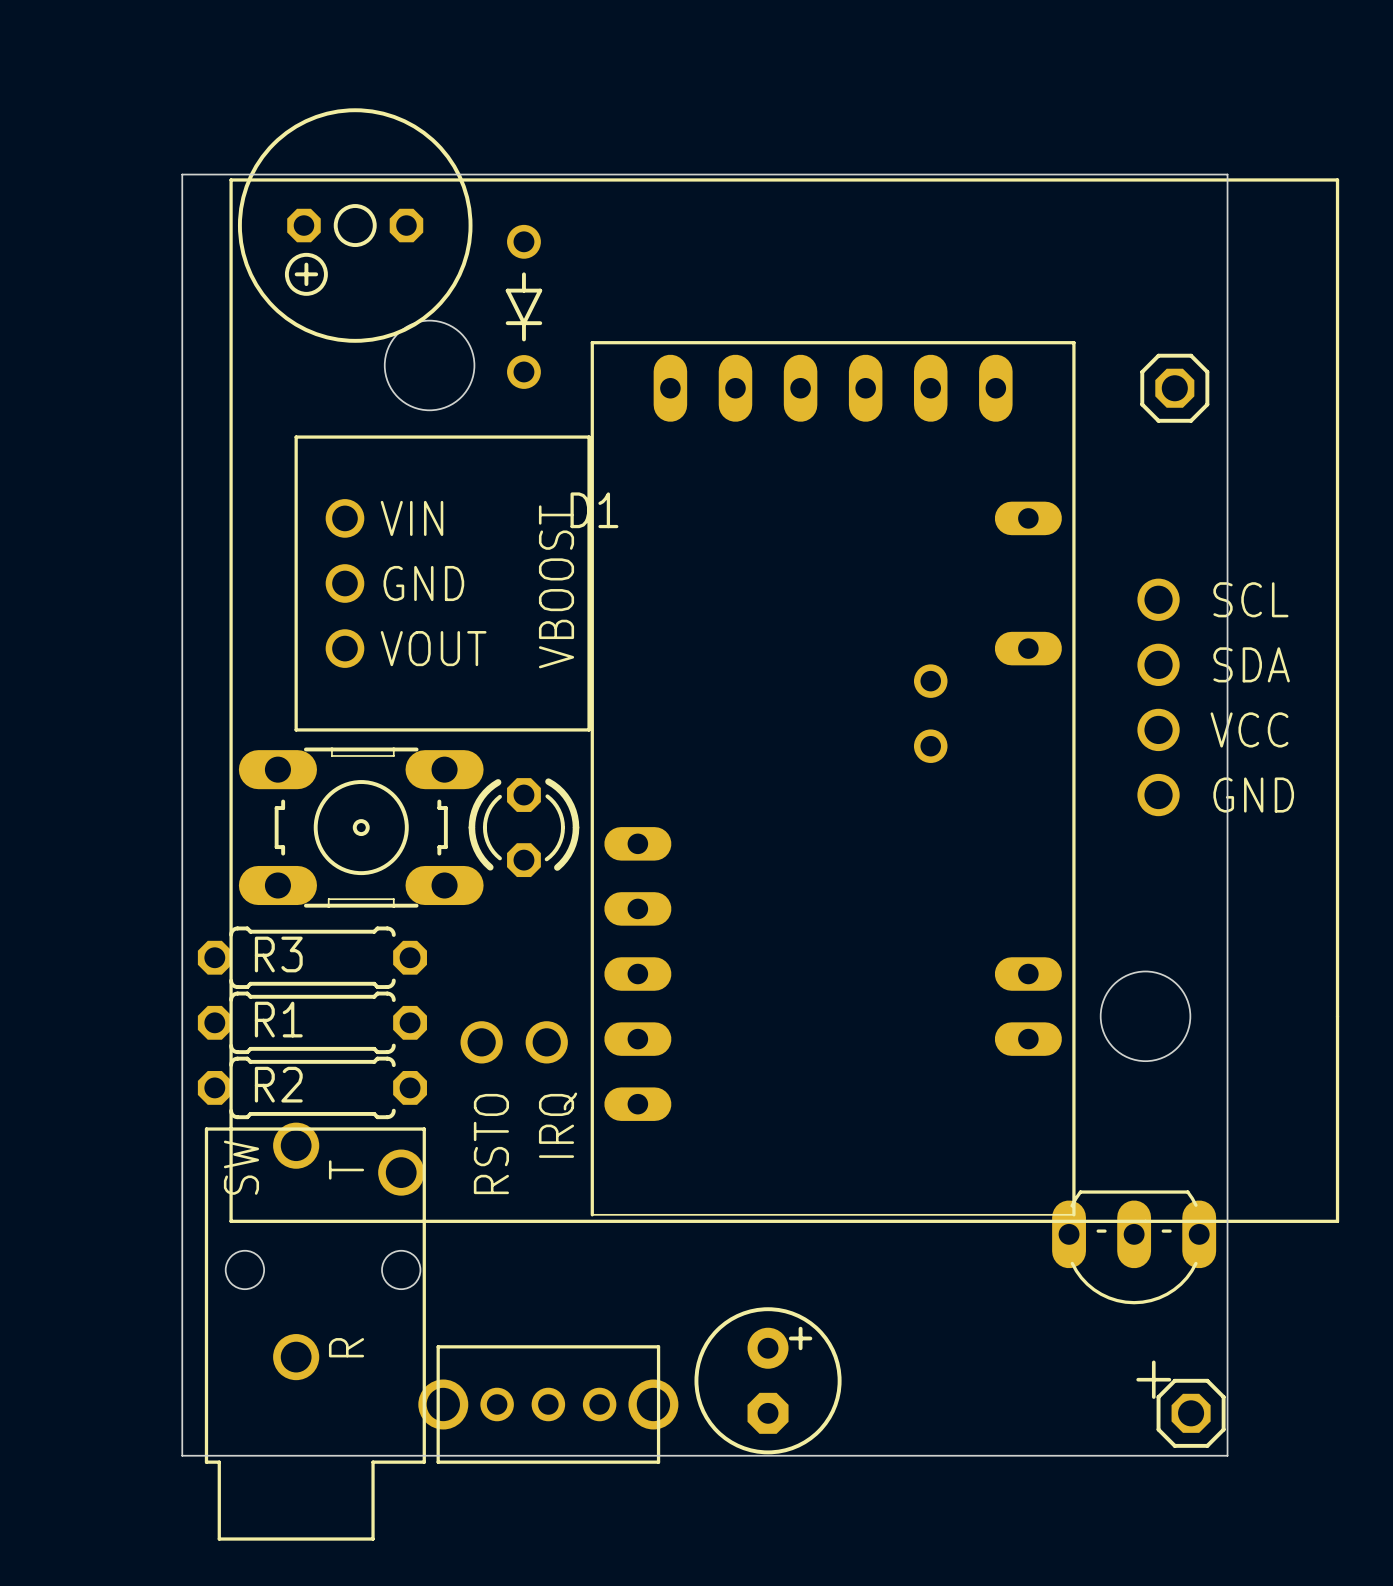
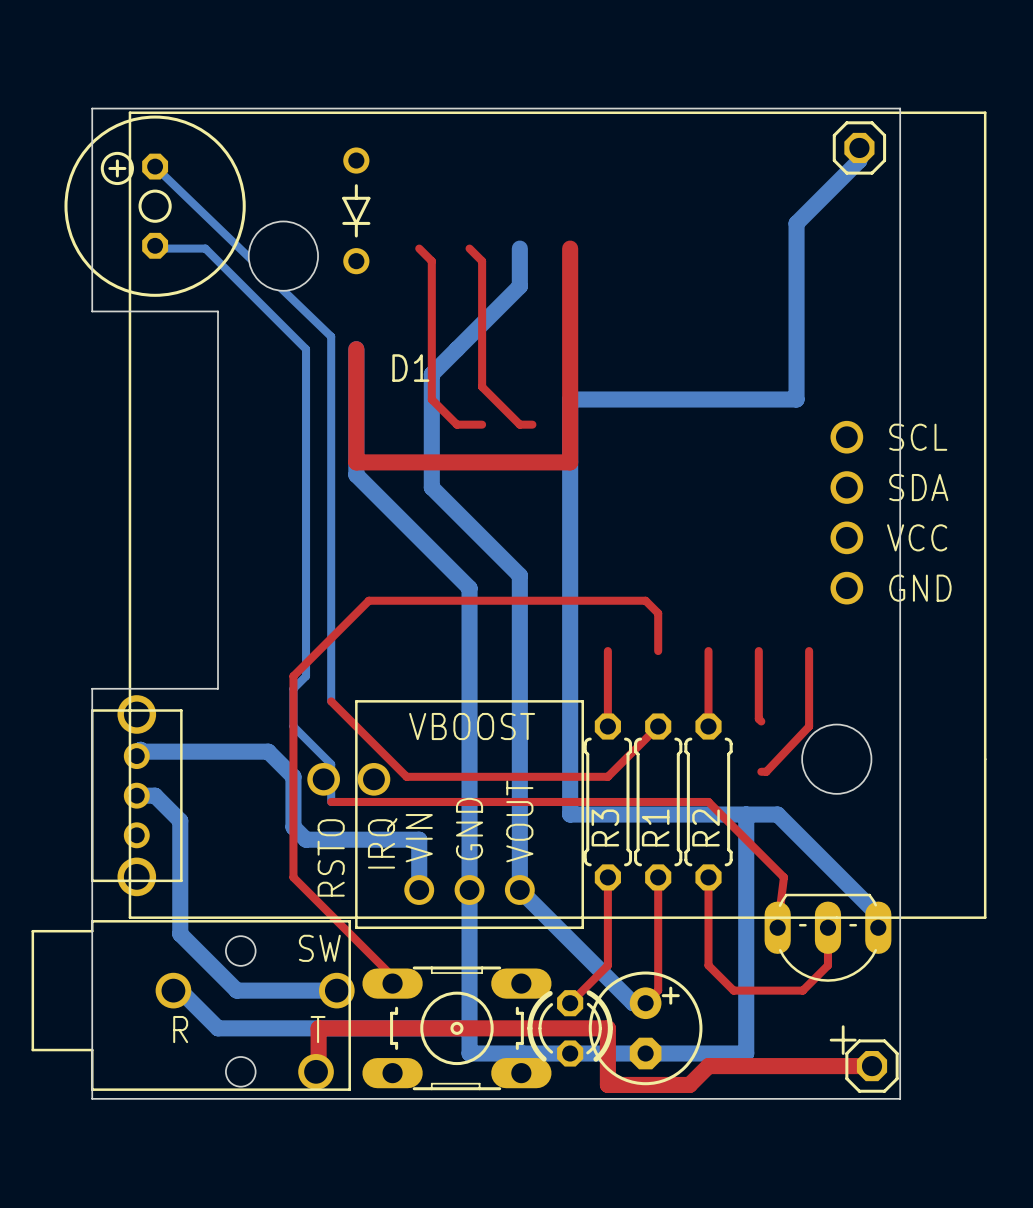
part rotation: 0° (355, 225) -> 90° clockwise (155, 206)
bottom track: none -> (859, 147) (859, 160) (796, 223) (796, 399) (570, 399) (570, 814) (777, 814) (878, 915) (878, 927)
bottom track: none -> (155, 166) (331, 336) (331, 701)
bottom track: none -> (155, 245) (157, 248) (205, 248) (306, 349) (306, 676) (293, 688) (293, 726) (331, 764) (331, 801)
top track: none -> (419, 248) (431, 261) (431, 399) (456, 424) (482, 424)
top track: none -> (469, 248) (482, 261) (482, 386) (519, 424) (532, 424)
bottom track: none -> (519, 248) (519, 286) (431, 374) (431, 487) (519, 575) (519, 890) (633, 1003) (645, 1003)
top track: none -> (570, 248) (570, 462) (356, 462) (356, 349)
part position: (1174, 388) -> (859, 147)
board edge: (182, 437) (182, 925) -> (92, 311) (218, 311) (218, 688) (92, 688)
bottom track: none -> (356, 349) (356, 474) (469, 588) (469, 1053) (521, 1055)
part: (442, 583) -> none
part: (833, 778) -> none
part rotation: 0° (361, 827) -> 180° (456, 1028)
part position: (361, 827) -> (456, 1028)
part position: (523, 827) -> (570, 1028)
top track: none -> (607, 651) (607, 726)
top track: none -> (658, 651) (658, 613) (645, 600) (368, 600) (293, 676) (293, 877) (392, 976) (392, 983)
top track: none -> (708, 651) (708, 726)
top track: none -> (758, 651) (758, 718) (761, 721)
top track: none -> (809, 651) (809, 726) (766, 771) (761, 771)
top track: none -> (331, 701) (406, 776) (607, 776) (658, 726)
R3 rotation: 0° (312, 957) -> 90° clockwise (607, 801)
R3 position: (312, 957) -> (607, 801)
bottom track: none -> (136, 756) (140, 749) (142, 751) (268, 751) (293, 776) (293, 827) (306, 839) (419, 839) (419, 890)
R1 rotation: 0° (312, 1022) -> 90° clockwise (658, 801)
R1 position: (312, 1022) -> (658, 801)
bottom track: none -> (136, 795) (155, 795) (180, 820) (180, 934) (236, 990) (336, 990)
top track: none -> (331, 801) (708, 801) (783, 877) (777, 927)
R2 rotation: 0° (312, 1087) -> 90° clockwise (708, 801)
R2 position: (312, 1087) -> (708, 801)
part: none -> (469, 814)
bottom track: none -> (746, 814) (746, 1053) (521, 1055)
top track: none -> (607, 877) (607, 965) (570, 1003)
top track: none -> (658, 877) (658, 990) (645, 1003)
top track: none -> (708, 877) (708, 965) (733, 990) (802, 990) (827, 965) (827, 927)
bottom track: none -> (173, 990) (180, 990) (218, 1028) (469, 1028)
part rotation: 0° (315, 1331) -> 90° clockwise (193, 1005)
part position: (768, 1380) -> (645, 1028)
part rotation: 0° (548, 1404) -> 90° clockwise (136, 795)
part position: (548, 1404) -> (136, 795)
top track: none -> (872, 1066) (708, 1066) (689, 1084) (607, 1084) (607, 1028) (318, 1028) (318, 1066) (310, 1066) (316, 1071)

